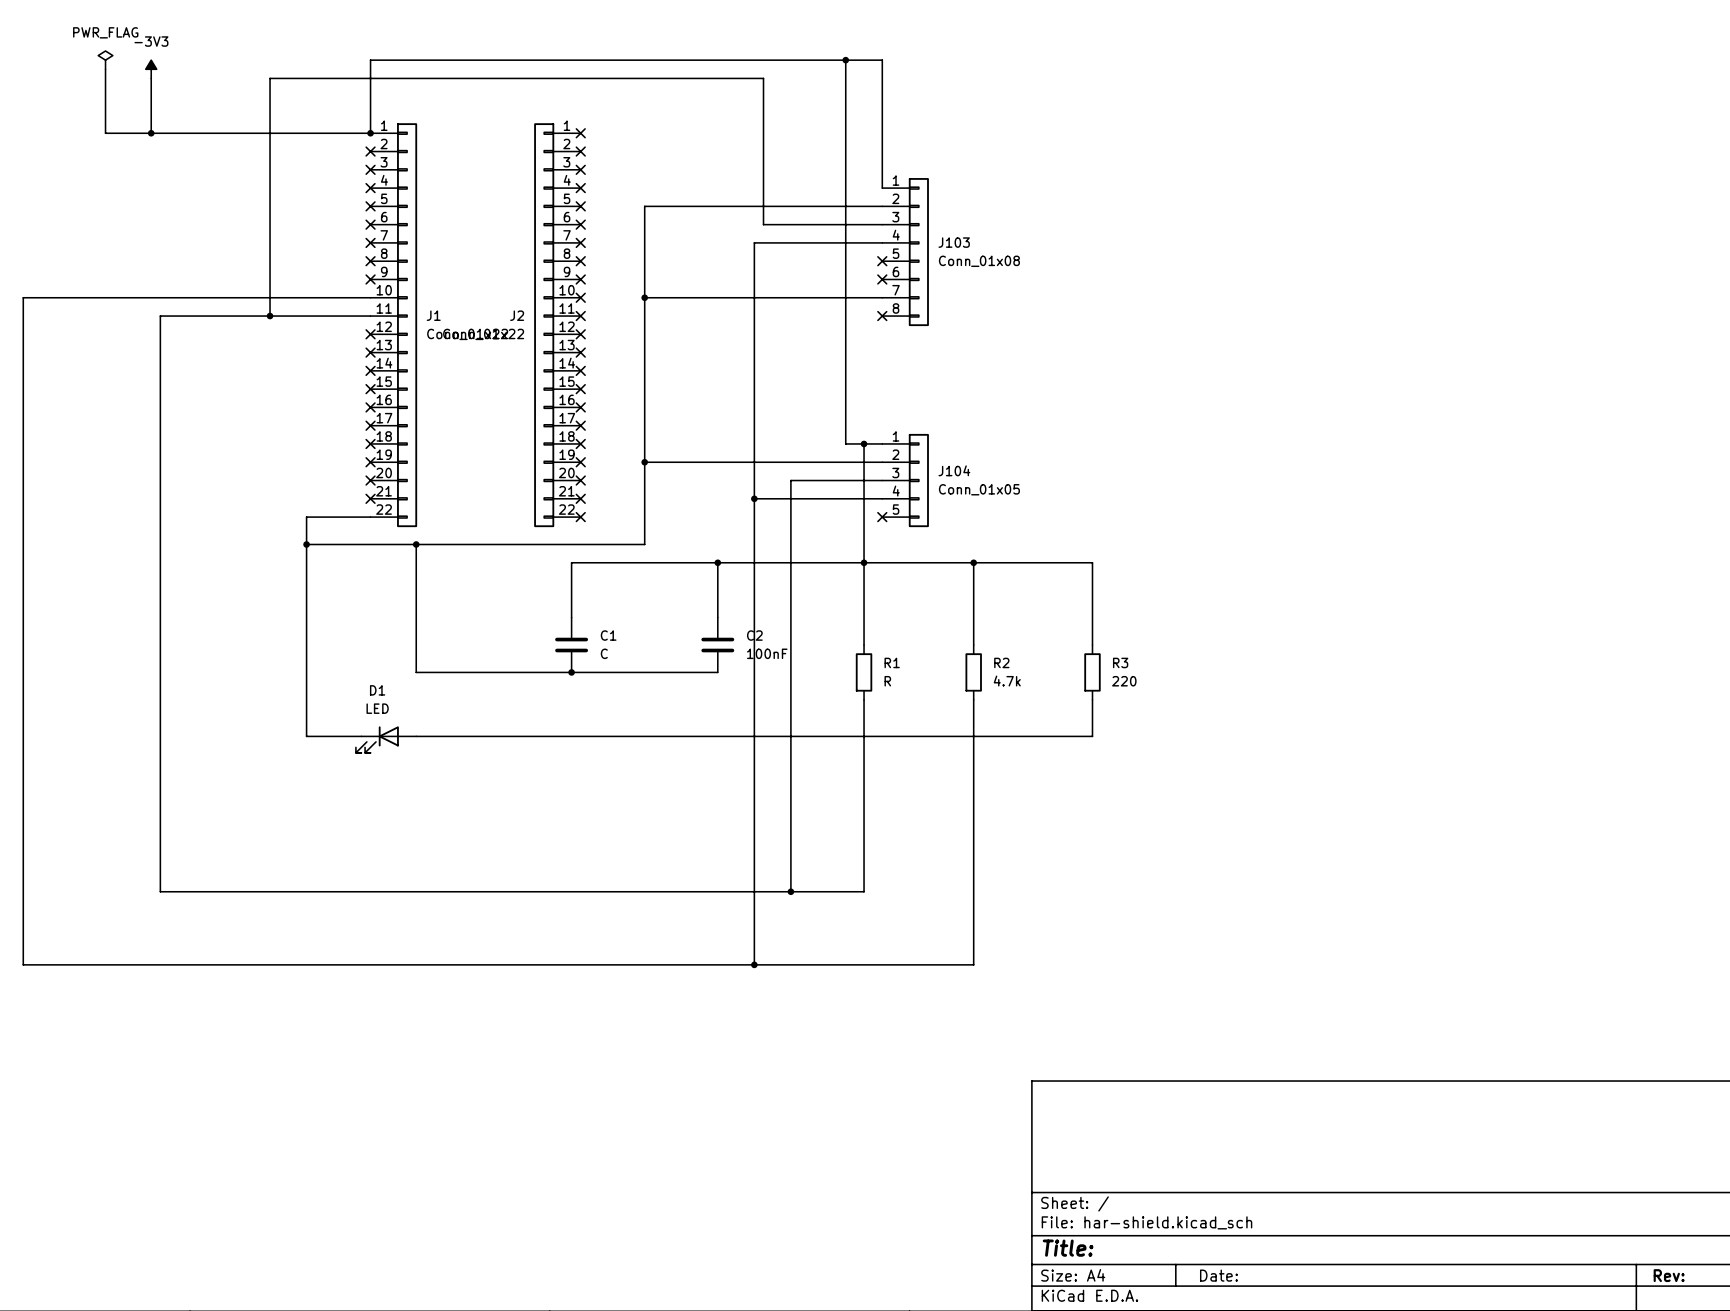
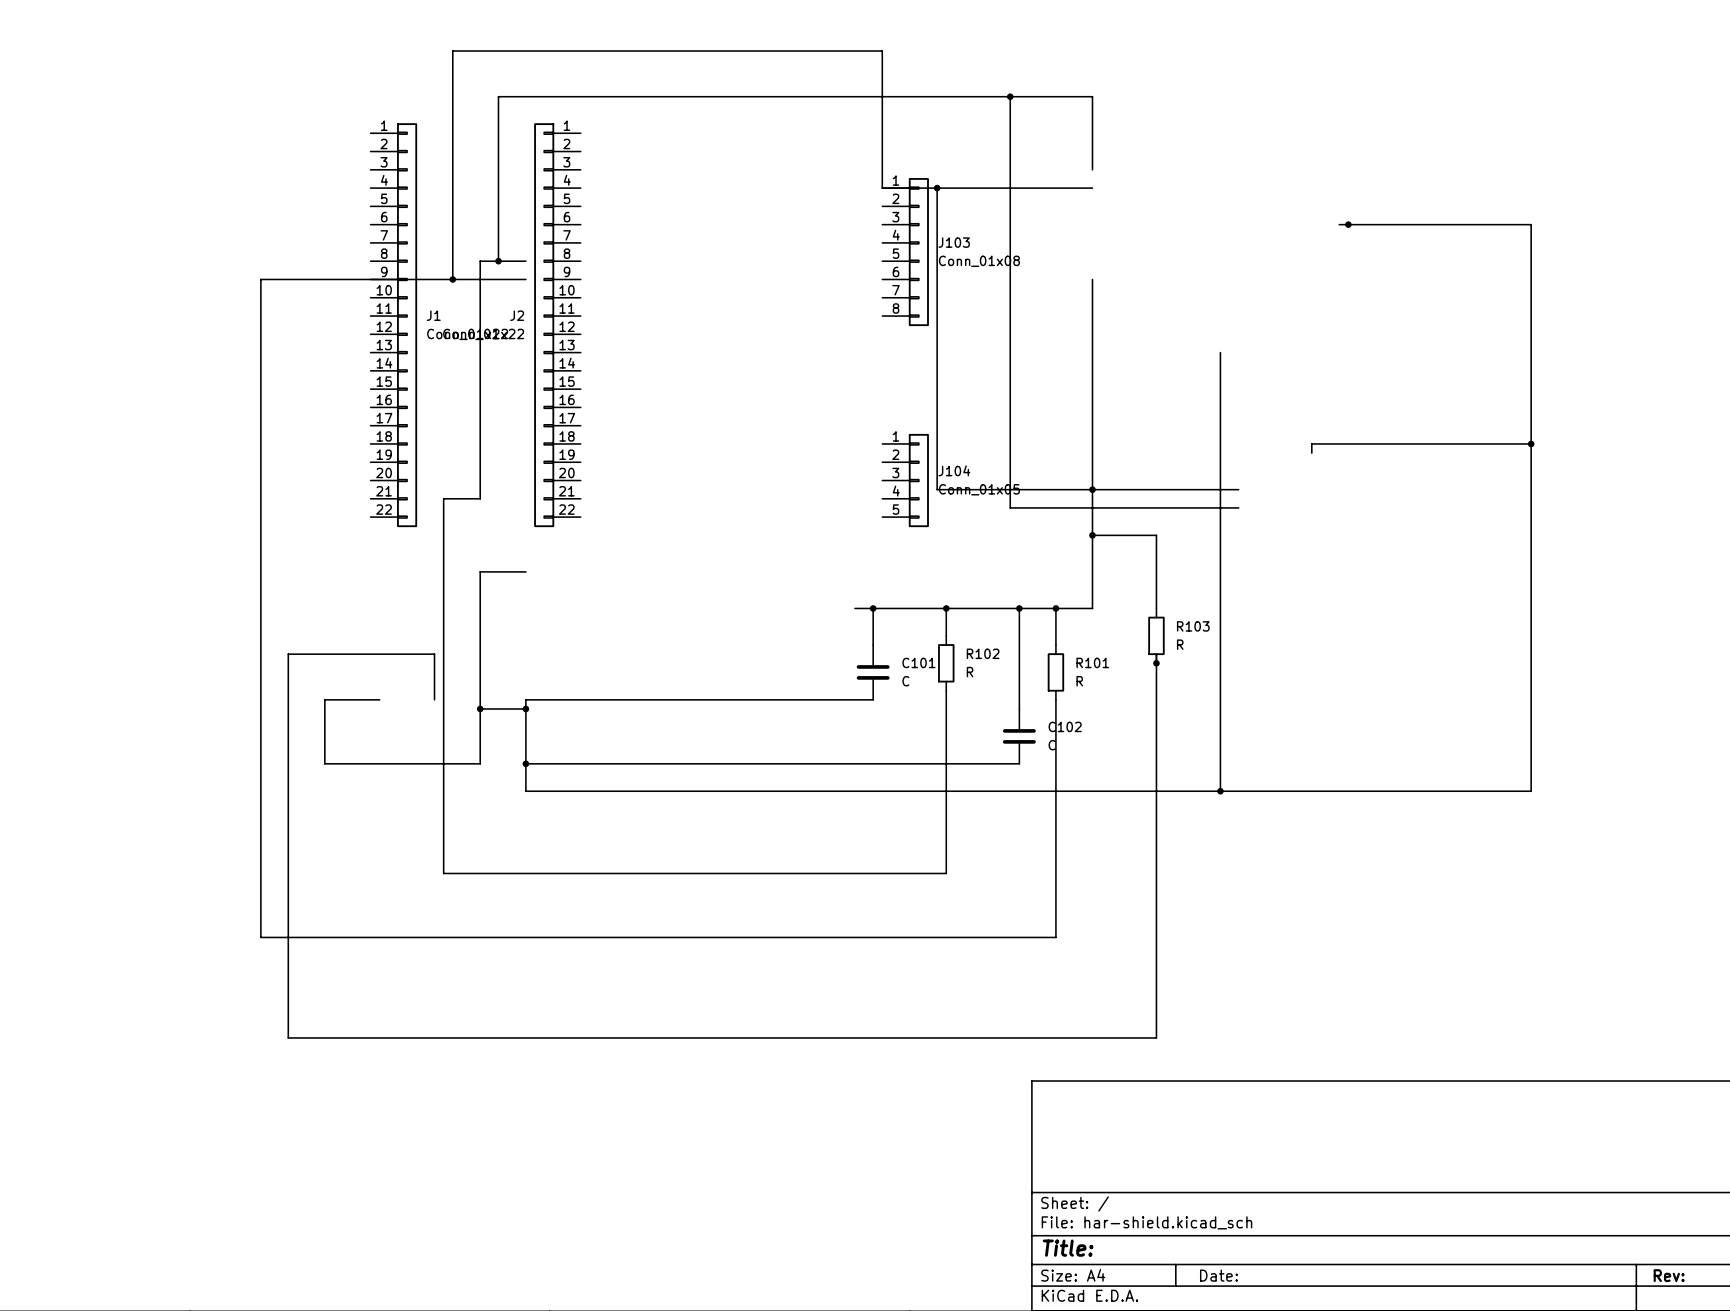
power symbol: PWR_FLAG (105, 60) -> none
wire: (845, 60) (845, 443) (882, 443) -> none
junction: (845, 60) -> none
wire: (882, 60) (370, 60) (370, 133) (105, 133) (105, 69) -> (882, 60) (882, 51) (452, 51) (452, 279)
power symbol: -3V3 (151, 69) -> none
wire: (151, 78) (151, 133) -> none
wire: none -> (1010, 96) (1010, 507) (1238, 507)
junction: none -> (1010, 96)
junction: (151, 133) -> none
junction: (370, 133) -> none
no-connect mark: (580, 133) -> none
no-connect mark: (370, 151) -> none
no-connect mark: (580, 151) -> none
no-connect mark: (370, 169) -> none
no-connect mark: (580, 169) -> none
wire: none -> (1092, 169) (1092, 96) (498, 96) (498, 261)
no-connect mark: (370, 188) -> none
no-connect mark: (580, 188) -> none
wire: none -> (882, 188) (1092, 188)
wire: none -> (937, 188) (937, 489) (1238, 489)
junction: none -> (937, 188)
no-connect mark: (370, 206) -> none
no-connect mark: (580, 206) -> none
wire: (882, 206) (644, 206) (644, 544) (306, 544) -> none
no-connect mark: (370, 224) -> none
no-connect mark: (580, 224) -> none
wire: (882, 224) (763, 224) (763, 78) (270, 78) (270, 316) -> none
wire: none -> (1339, 224) (1531, 224) (1531, 791) (525, 791) (525, 699) (873, 699)
junction: none -> (1348, 224)
no-connect mark: (370, 242) -> none
no-connect mark: (580, 242) -> none
wire: (882, 242) (754, 242) (754, 964) -> none
no-connect mark: (370, 261) -> none
junction: none -> (498, 261)
wire: none -> (525, 261) (480, 261) (480, 498) (443, 498) (443, 873) (946, 873) (946, 690)
no-connect mark: (580, 261) -> none
no-connect mark: (882, 261) -> none
no-connect mark: (370, 279) -> none
junction: none -> (452, 279)
wire: none -> (525, 279) (260, 279) (260, 937) (1055, 937) (1055, 699)
no-connect mark: (580, 279) -> none
no-connect mark: (882, 279) -> none
wire: (370, 297) (23, 297) (23, 964) (973, 964) (973, 699) -> none
no-connect mark: (580, 297) -> none
wire: (644, 297) (882, 297) -> none
junction: (644, 297) -> none
junction: (270, 316) -> none
wire: (370, 316) (160, 316) (160, 891) (864, 891) (864, 699) -> none
no-connect mark: (580, 316) -> none
no-connect mark: (882, 316) -> none
no-connect mark: (370, 334) -> none
no-connect mark: (580, 334) -> none
no-connect mark: (370, 352) -> none
no-connect mark: (580, 352) -> none
wire: none -> (1220, 352) (1220, 791)
no-connect mark: (370, 370) -> none
no-connect mark: (580, 370) -> none
no-connect mark: (370, 389) -> none
no-connect mark: (580, 389) -> none
no-connect mark: (370, 407) -> none
no-connect mark: (580, 407) -> none
no-connect mark: (370, 425) -> none
no-connect mark: (580, 425) -> none
no-connect mark: (370, 443) -> none
no-connect mark: (580, 443) -> none
wire: (864, 443) (864, 645) -> none
junction: (864, 443) -> none
wire: none -> (1531, 443) (1311, 443) (1311, 453)
junction: none -> (1531, 443)
no-connect mark: (370, 462) -> none
no-connect mark: (580, 462) -> none
wire: (644, 462) (882, 462) -> none
junction: (644, 462) -> none
no-connect mark: (370, 480) -> none
no-connect mark: (580, 480) -> none
wire: (882, 480) (790, 480) (790, 891) -> none
junction: none -> (1092, 489)
no-connect mark: (370, 498) -> none
no-connect mark: (580, 498) -> none
wire: (754, 498) (882, 498) -> none
junction: (754, 498) -> none
wire: (370, 517) (306, 517) (306, 736) (361, 736) -> none
no-connect mark: (580, 517) -> none
no-connect mark: (882, 517) -> none
wire: none -> (1092, 535) (1156, 535) (1156, 608)
junction: none -> (1092, 535)
junction: (306, 544) -> none
wire: (416, 544) (416, 672) (717, 672) -> none
junction: (416, 544) -> none
wire: (717, 562) (717, 617) -> none
junction: (717, 562) -> none
junction: (864, 562) -> none
wire: (973, 562) (973, 645) -> none
junction: (973, 562) -> none
wire: (1092, 562) (571, 562) (571, 617) -> (1092, 562) (1092, 279)
wire: none -> (525, 571) (480, 571) (480, 763) (324, 763) (324, 699) (379, 699)
wire: none -> (873, 608) (873, 645)
junction: none -> (873, 608)
wire: none -> (946, 608) (946, 635)
junction: none -> (946, 608)
wire: none -> (1019, 608) (1019, 708)
junction: none -> (1019, 608)
wire: none -> (1055, 608) (1055, 645)
junction: none -> (1055, 608)
wire: (1092, 608) (1092, 645) -> (1092, 608) (854, 608)
R103: none -> R (1156, 635)
C1: C (571, 645) -> none
C2: 100nF (717, 645) -> none
wire: none -> (1156, 654) (1156, 1037) (288, 1037) (288, 654) (434, 654) (434, 699)
R102: none -> R (946, 663)
junction: none -> (1156, 663)
junction: (571, 672) -> none
R1: R (864, 672) -> none
C101: none -> C (873, 672)
R2: 4.7k (973, 672) -> none
R101: none -> R (1055, 672)
R3: 220 (1092, 672) -> none
wire: (1092, 699) (1092, 736) (416, 736) -> none
wire: none -> (480, 708) (525, 708)
junction: none -> (480, 708)
junction: none -> (525, 708)
C102: none -> C (1019, 736)
D1: LED (386, 739) -> none
wire: none -> (525, 763) (1019, 763)
junction: none -> (525, 763)
junction: none -> (1220, 791)
junction: (790, 891) -> none
junction: (754, 964) -> none

